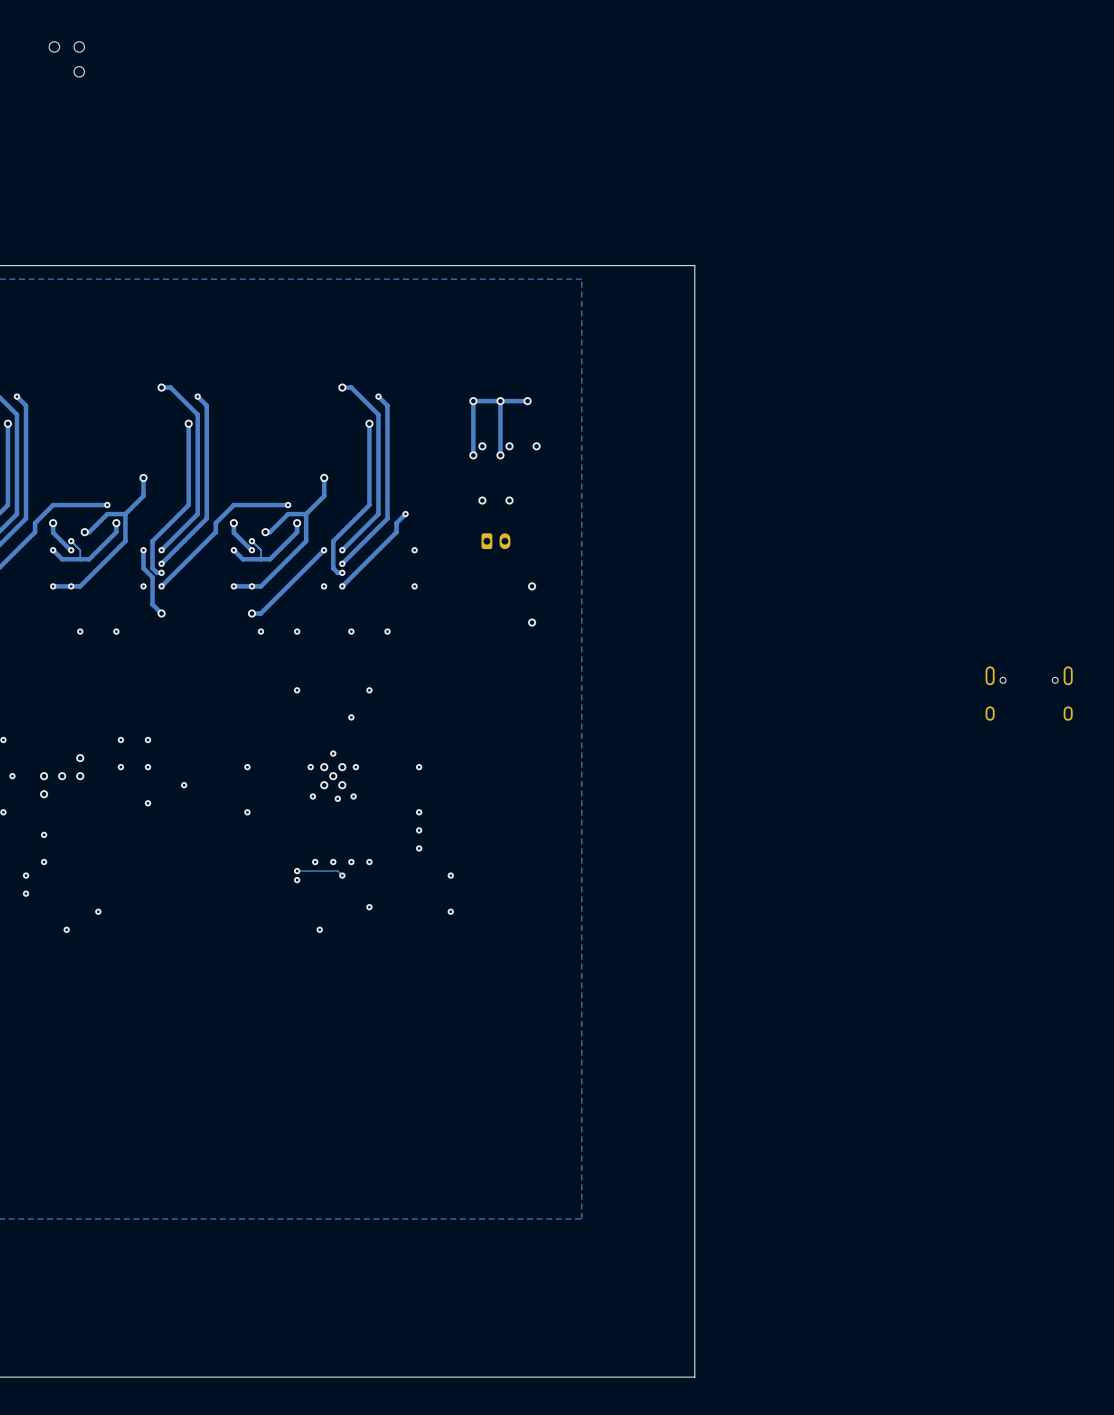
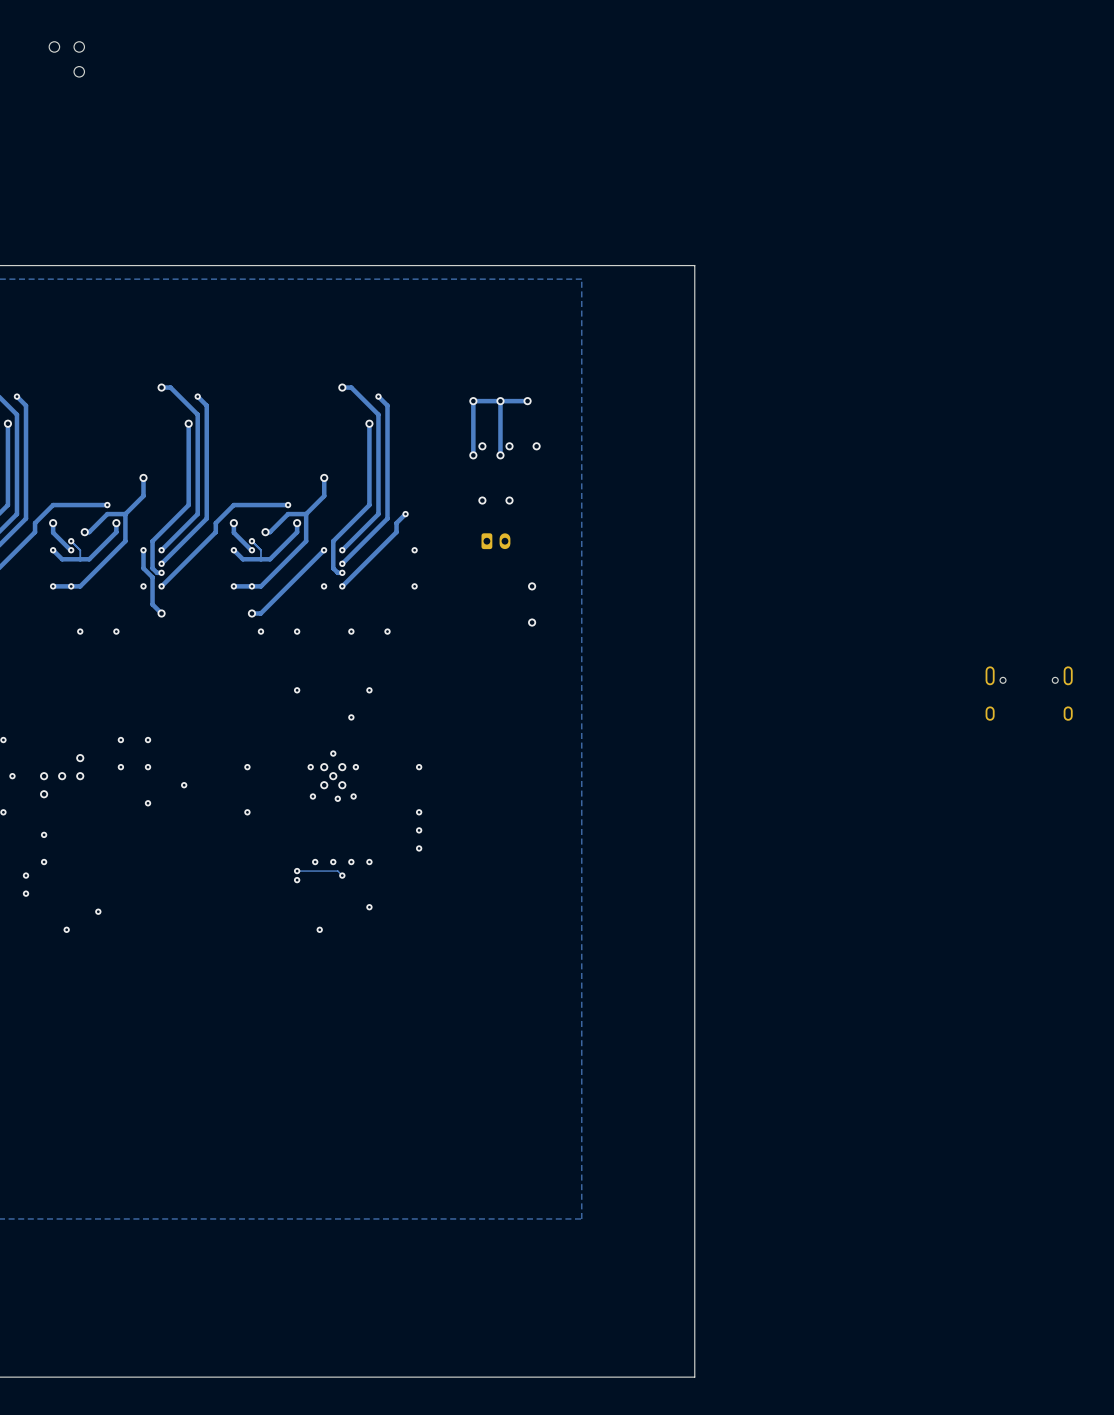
via: (450, 875) -> none
via: (450, 911) -> none

